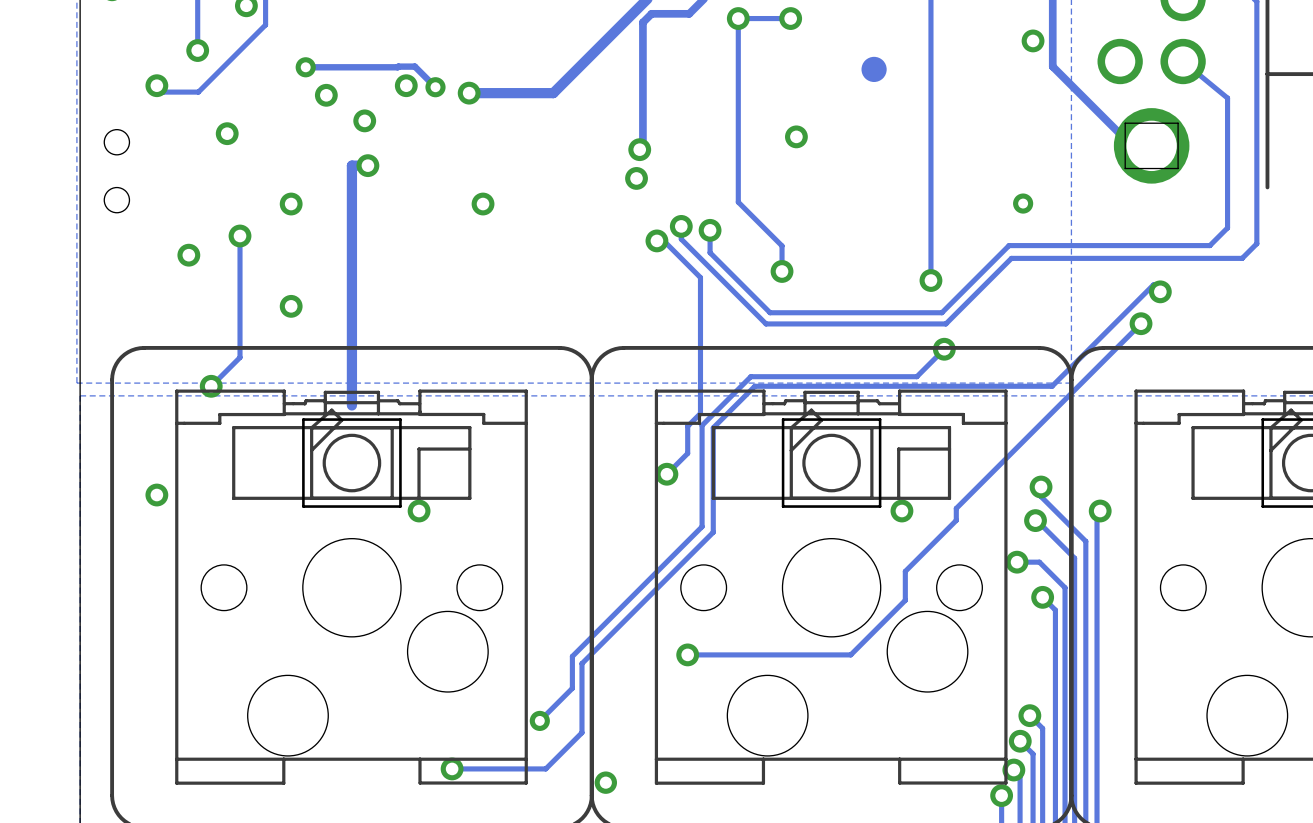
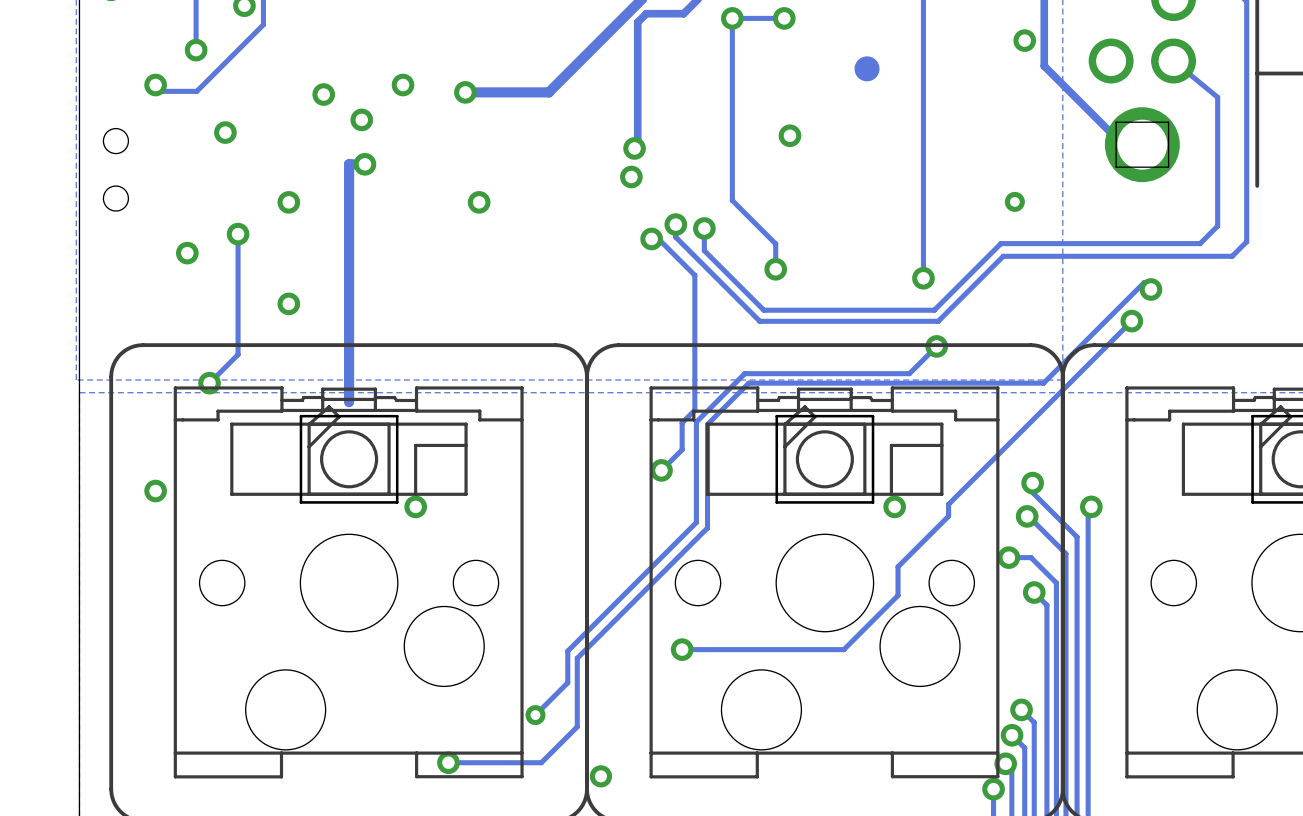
track: (305, 67) (414, 66) (435, 87) -> none
via: (305, 67) -> none
via: (435, 87) -> none

